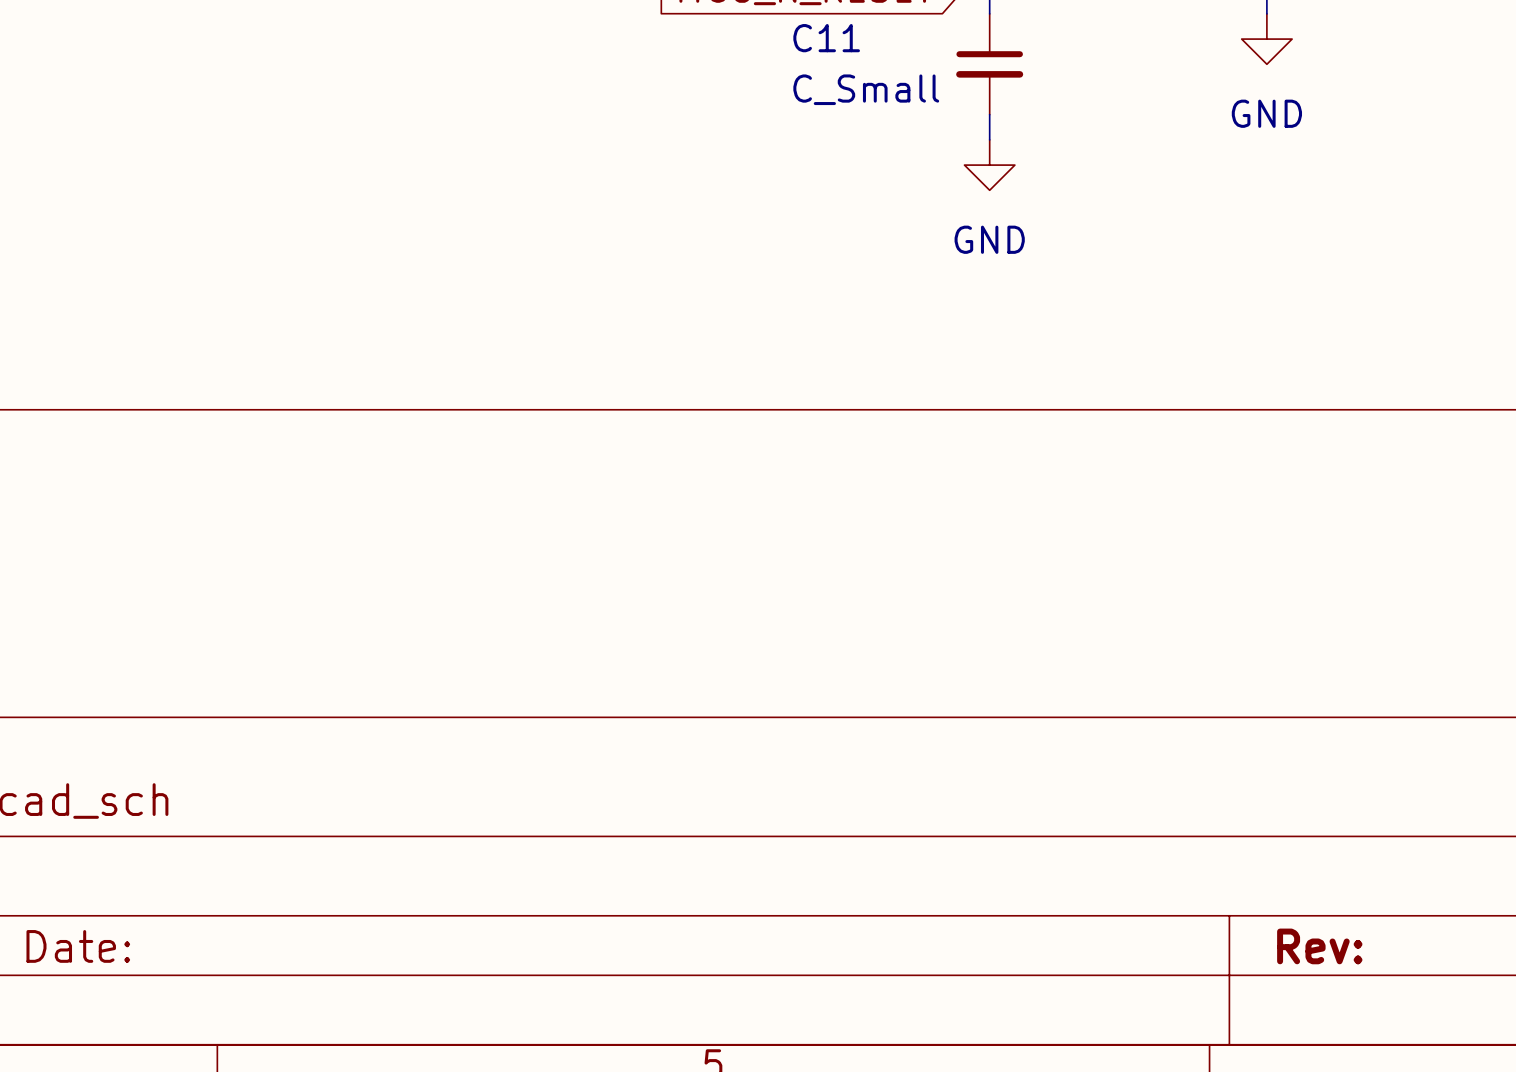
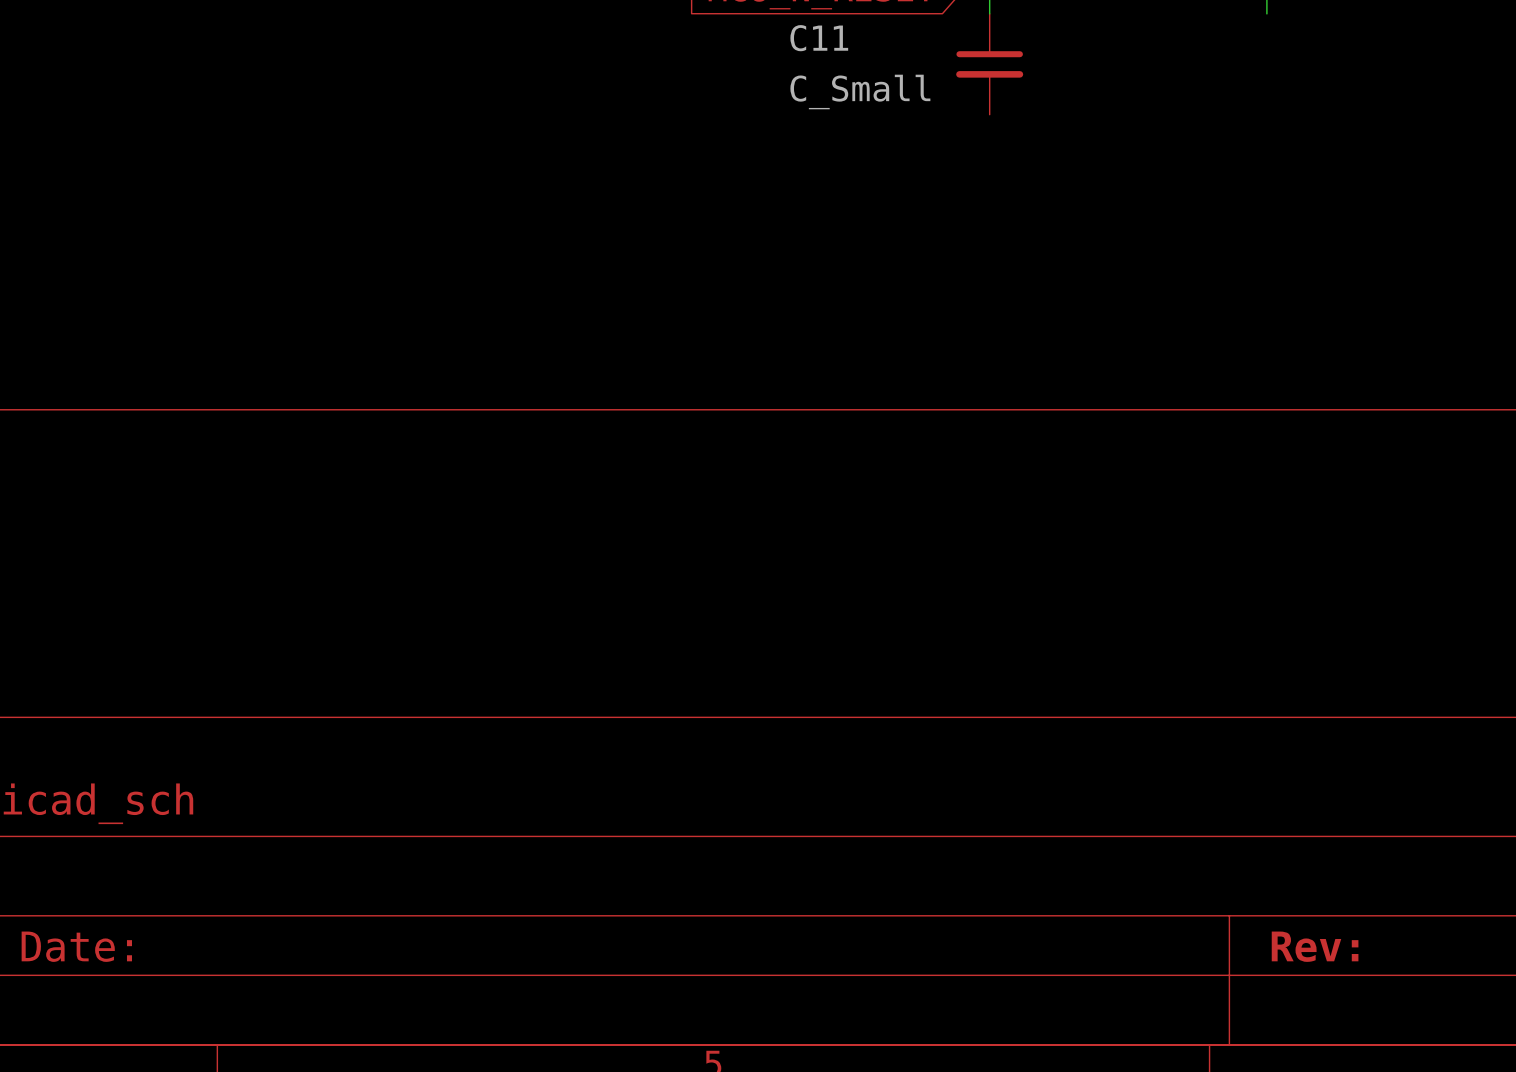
power symbol: GND (1266, 39) -> none
wire: (989, 114) (989, 139) -> none
power symbol: GND (989, 165) -> none

